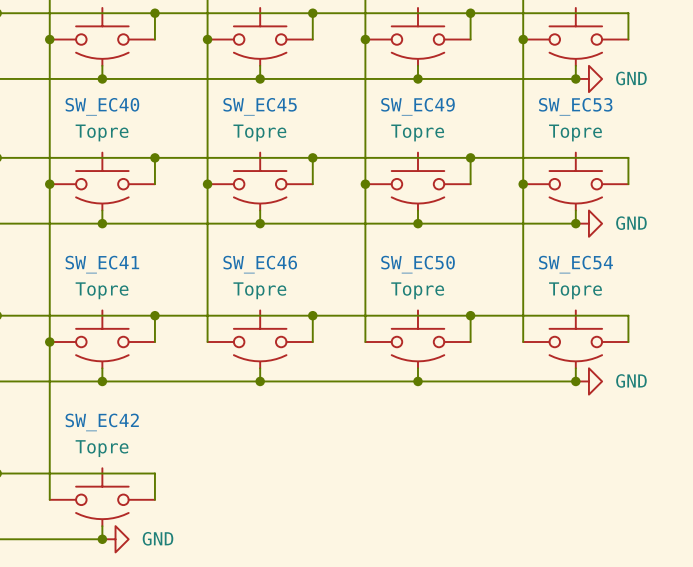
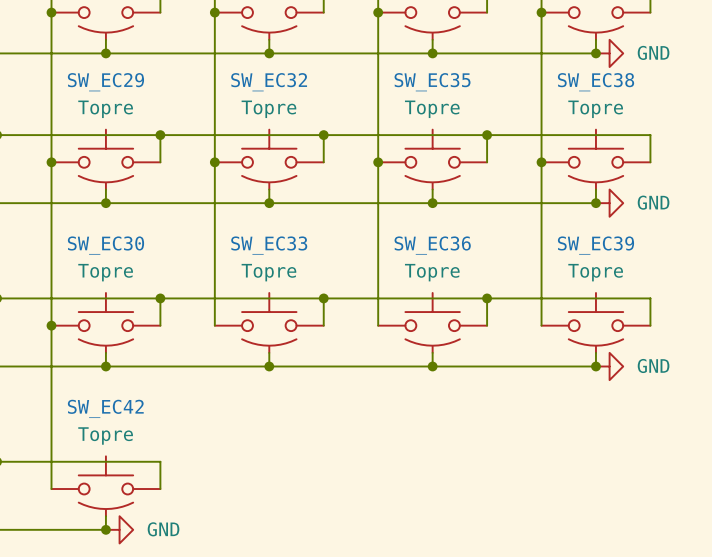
SW_EC40 name: SW_EC40 (102, 106) -> SW_EC29 (105, 82)
SW_EC45 name: SW_EC45 (260, 106) -> SW_EC32 (269, 82)
SW_EC49 name: SW_EC49 (417, 106) -> SW_EC35 (432, 82)
SW_EC53 name: SW_EC53 (575, 106) -> SW_EC38 (596, 82)
SW_EC41 name: SW_EC41 (102, 264) -> SW_EC30 (105, 245)
SW_EC46 name: SW_EC46 (260, 264) -> SW_EC33 (269, 245)
SW_EC50 name: SW_EC50 (418, 264) -> SW_EC36 (432, 245)
SW_EC54 name: SW_EC54 (575, 264) -> SW_EC39 (595, 245)

